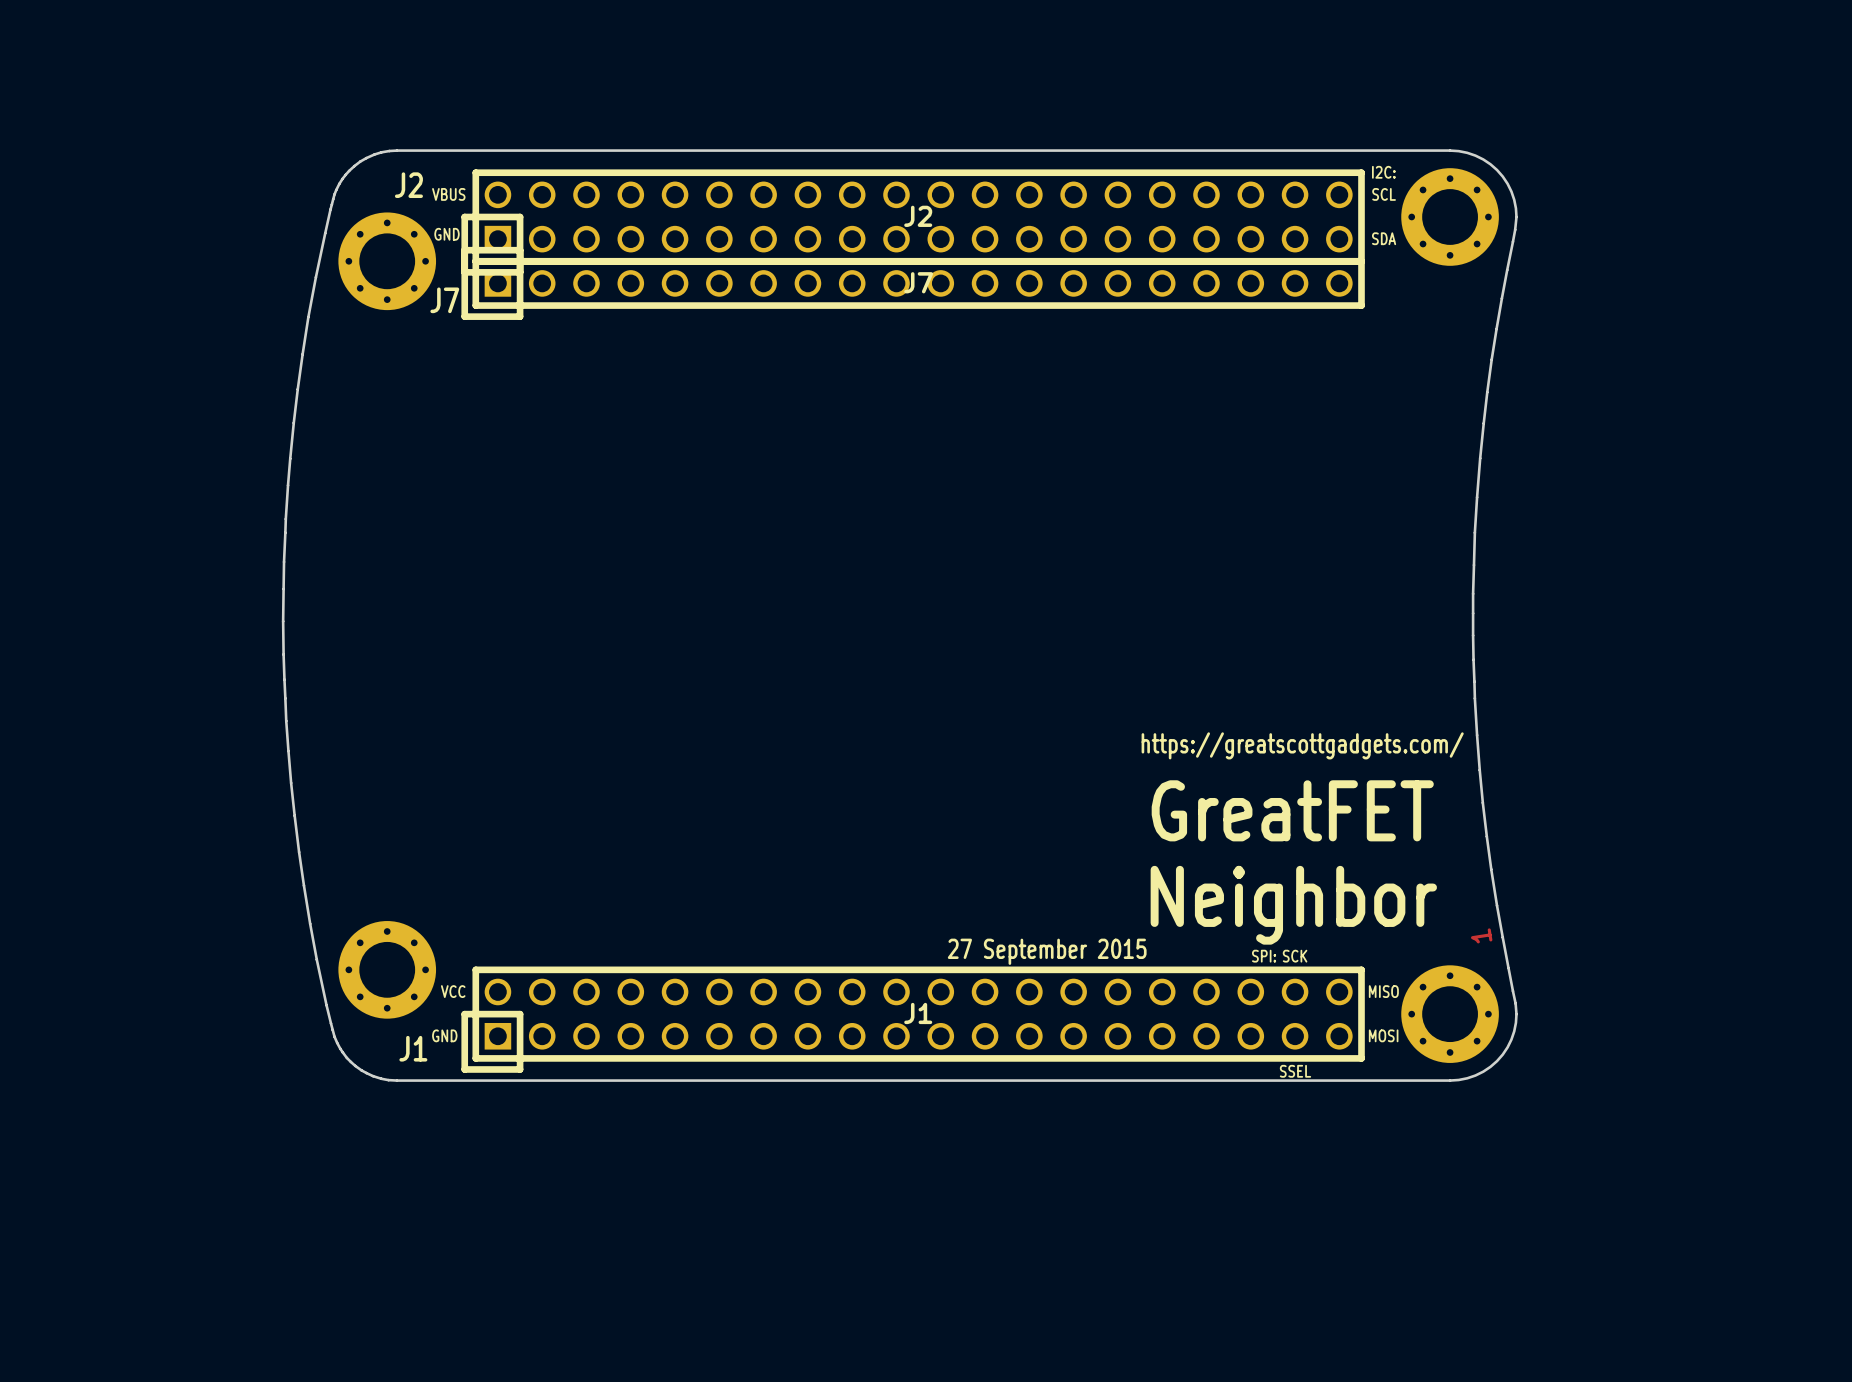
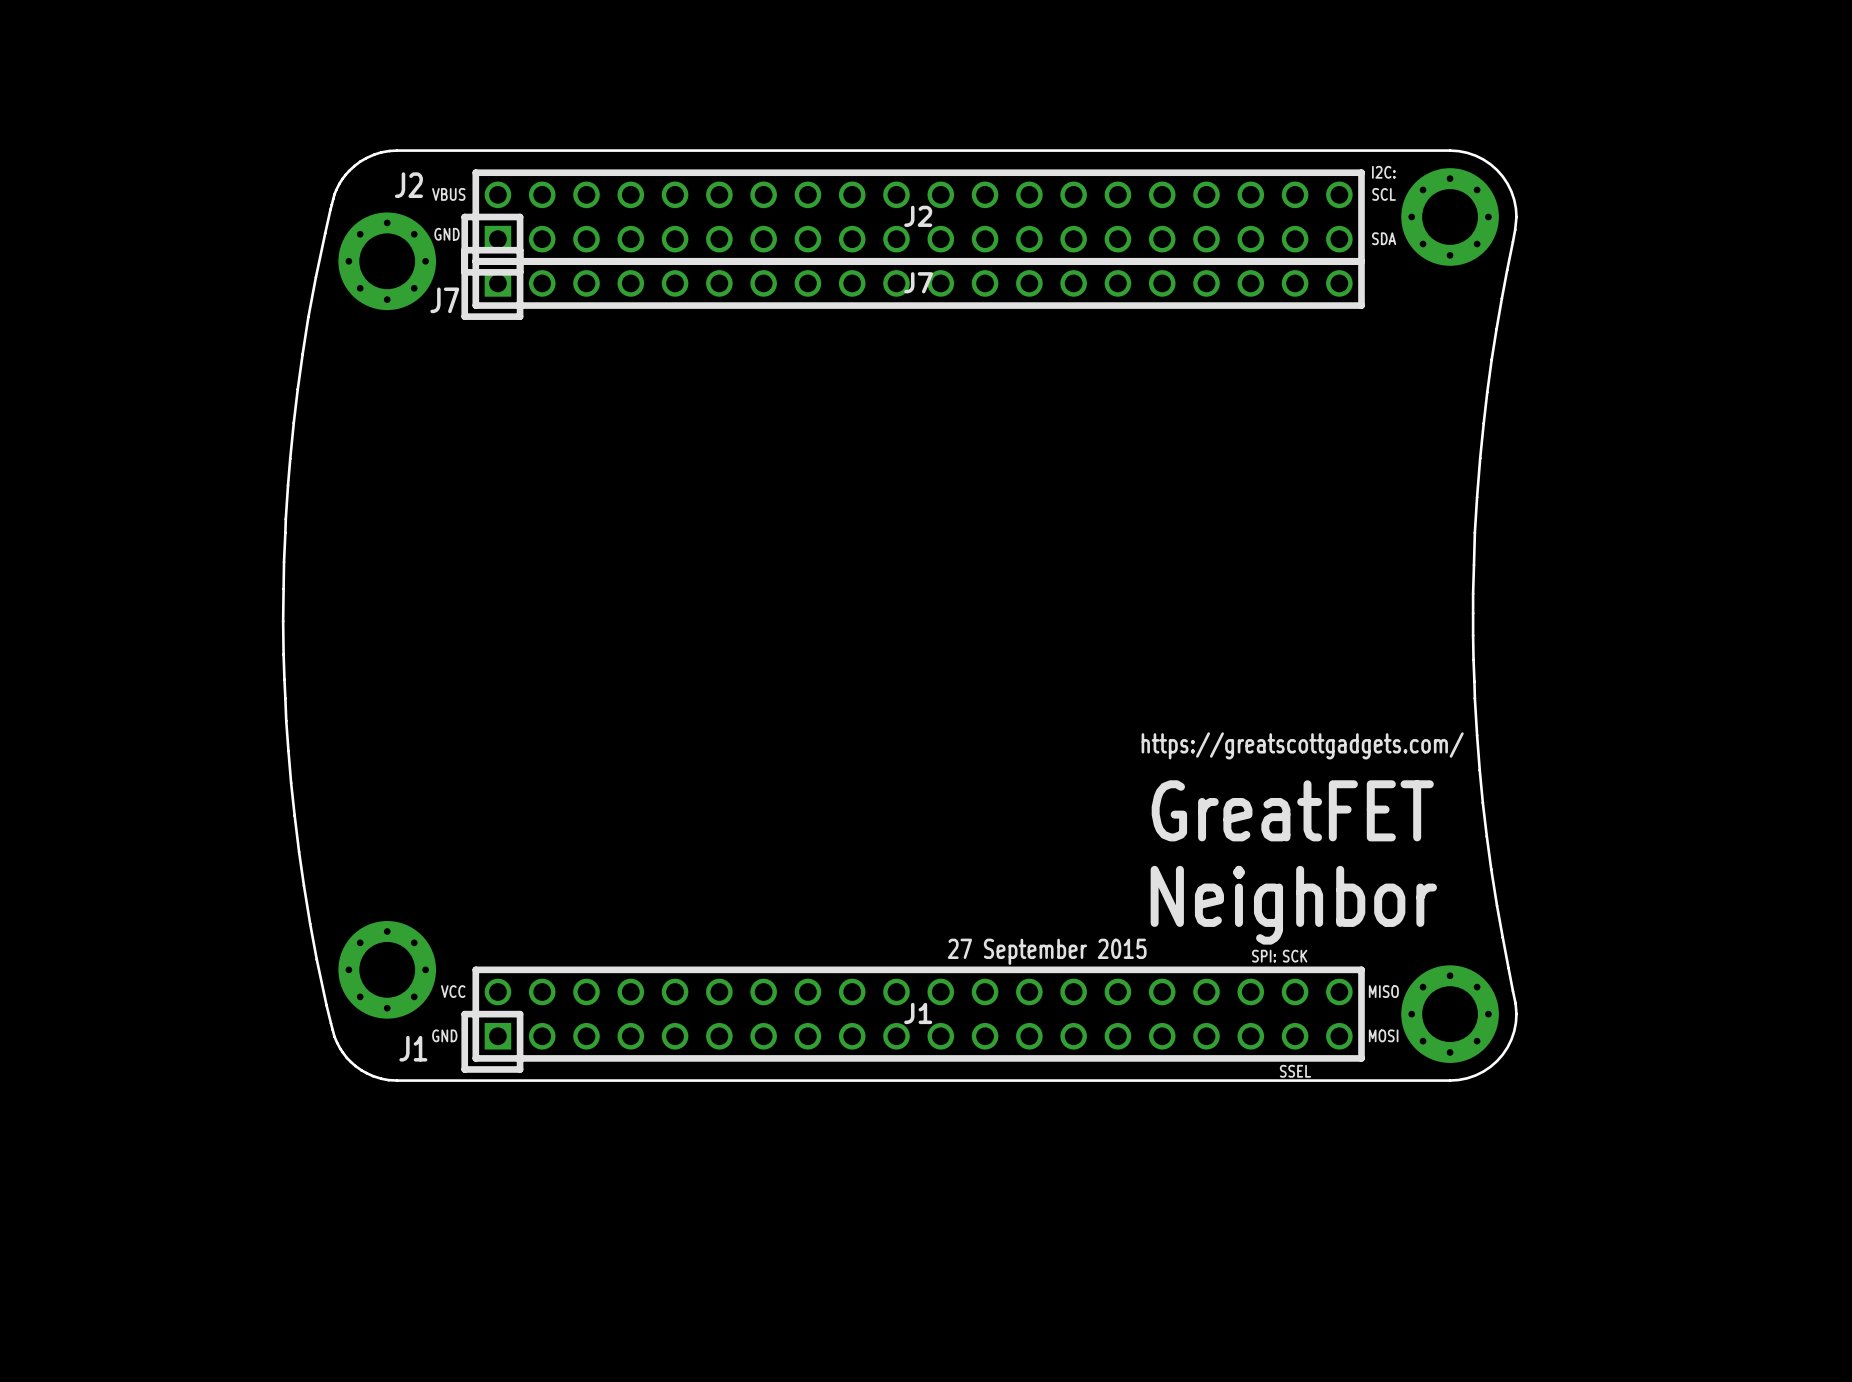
text: 1 (1481, 935) -> none

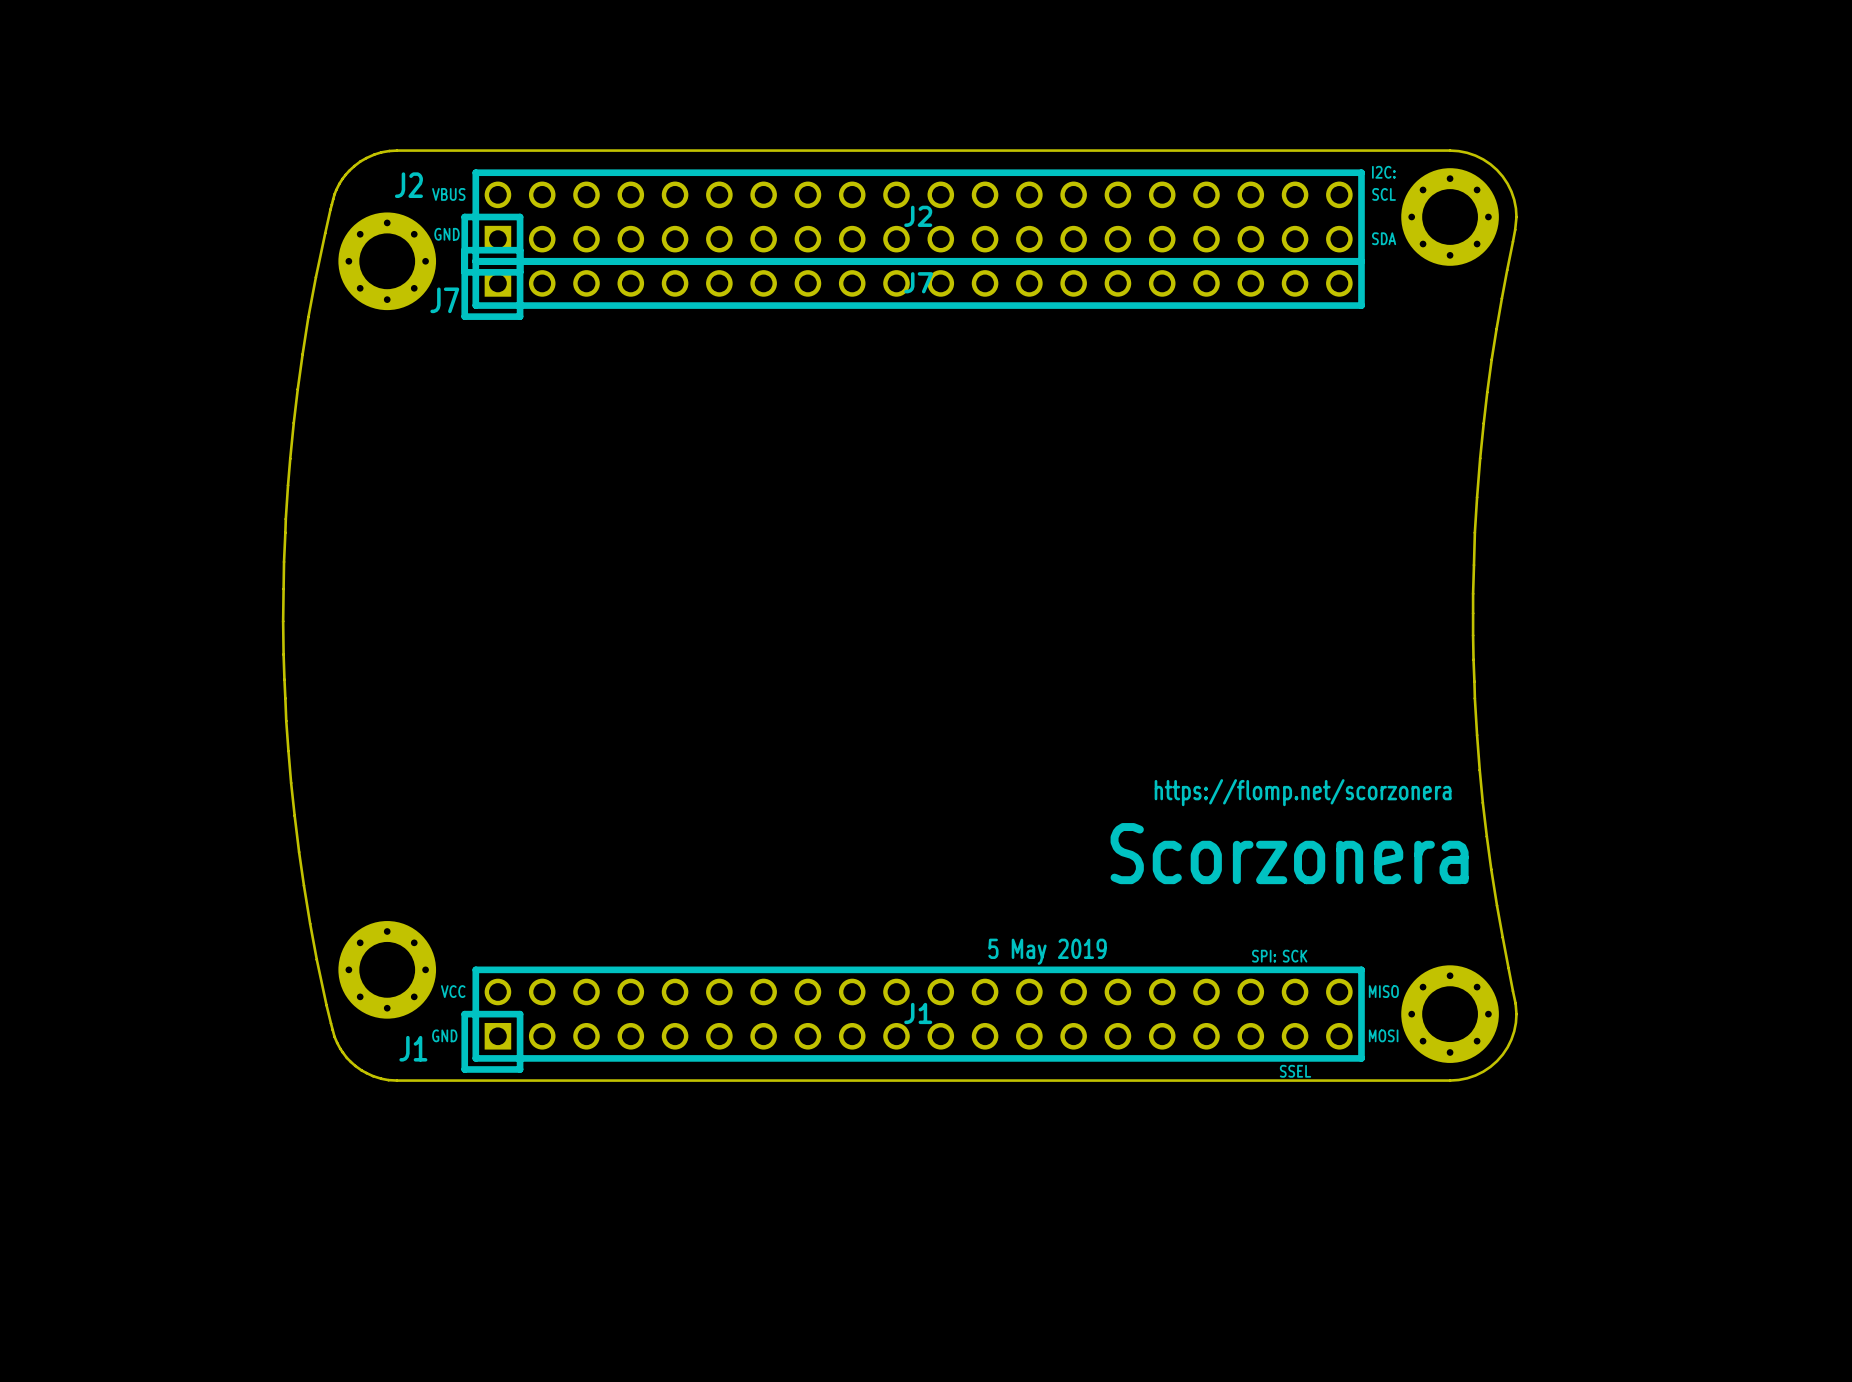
text: https://greatscottgadgets.com/ (1302, 745) -> none
text: none -> https://flomp.net/scorzonera (1303, 792)
text: GreatFET (1292, 810) -> none
text: none -> Scorzonera (1289, 853)
text: Neighbor (1293, 905) -> none
text: 27 September 2015 (1047, 951) -> 5 May 2019 (1047, 951)

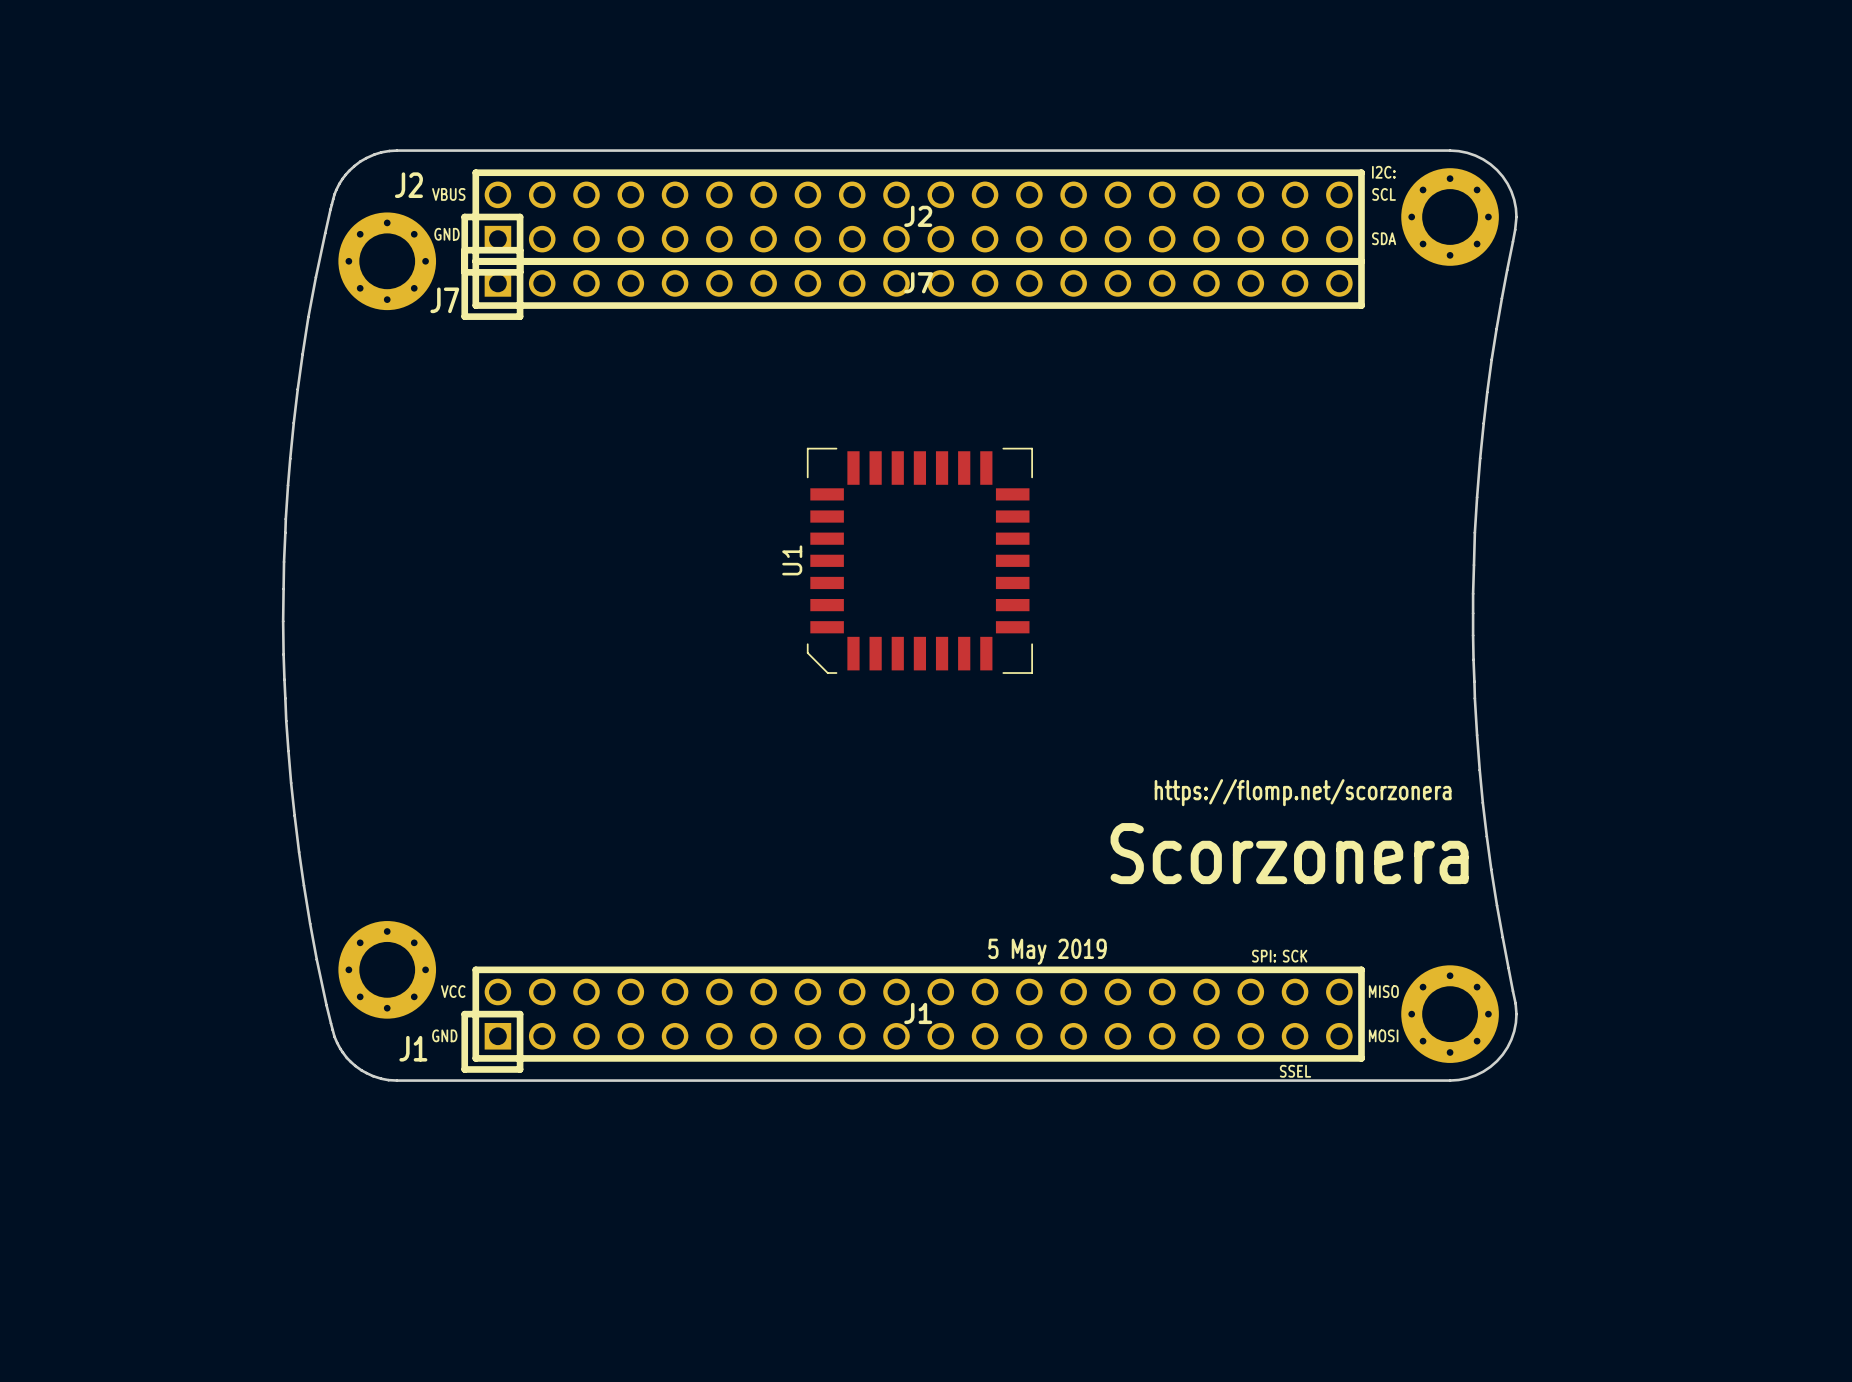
U1: none -> (919, 560)

